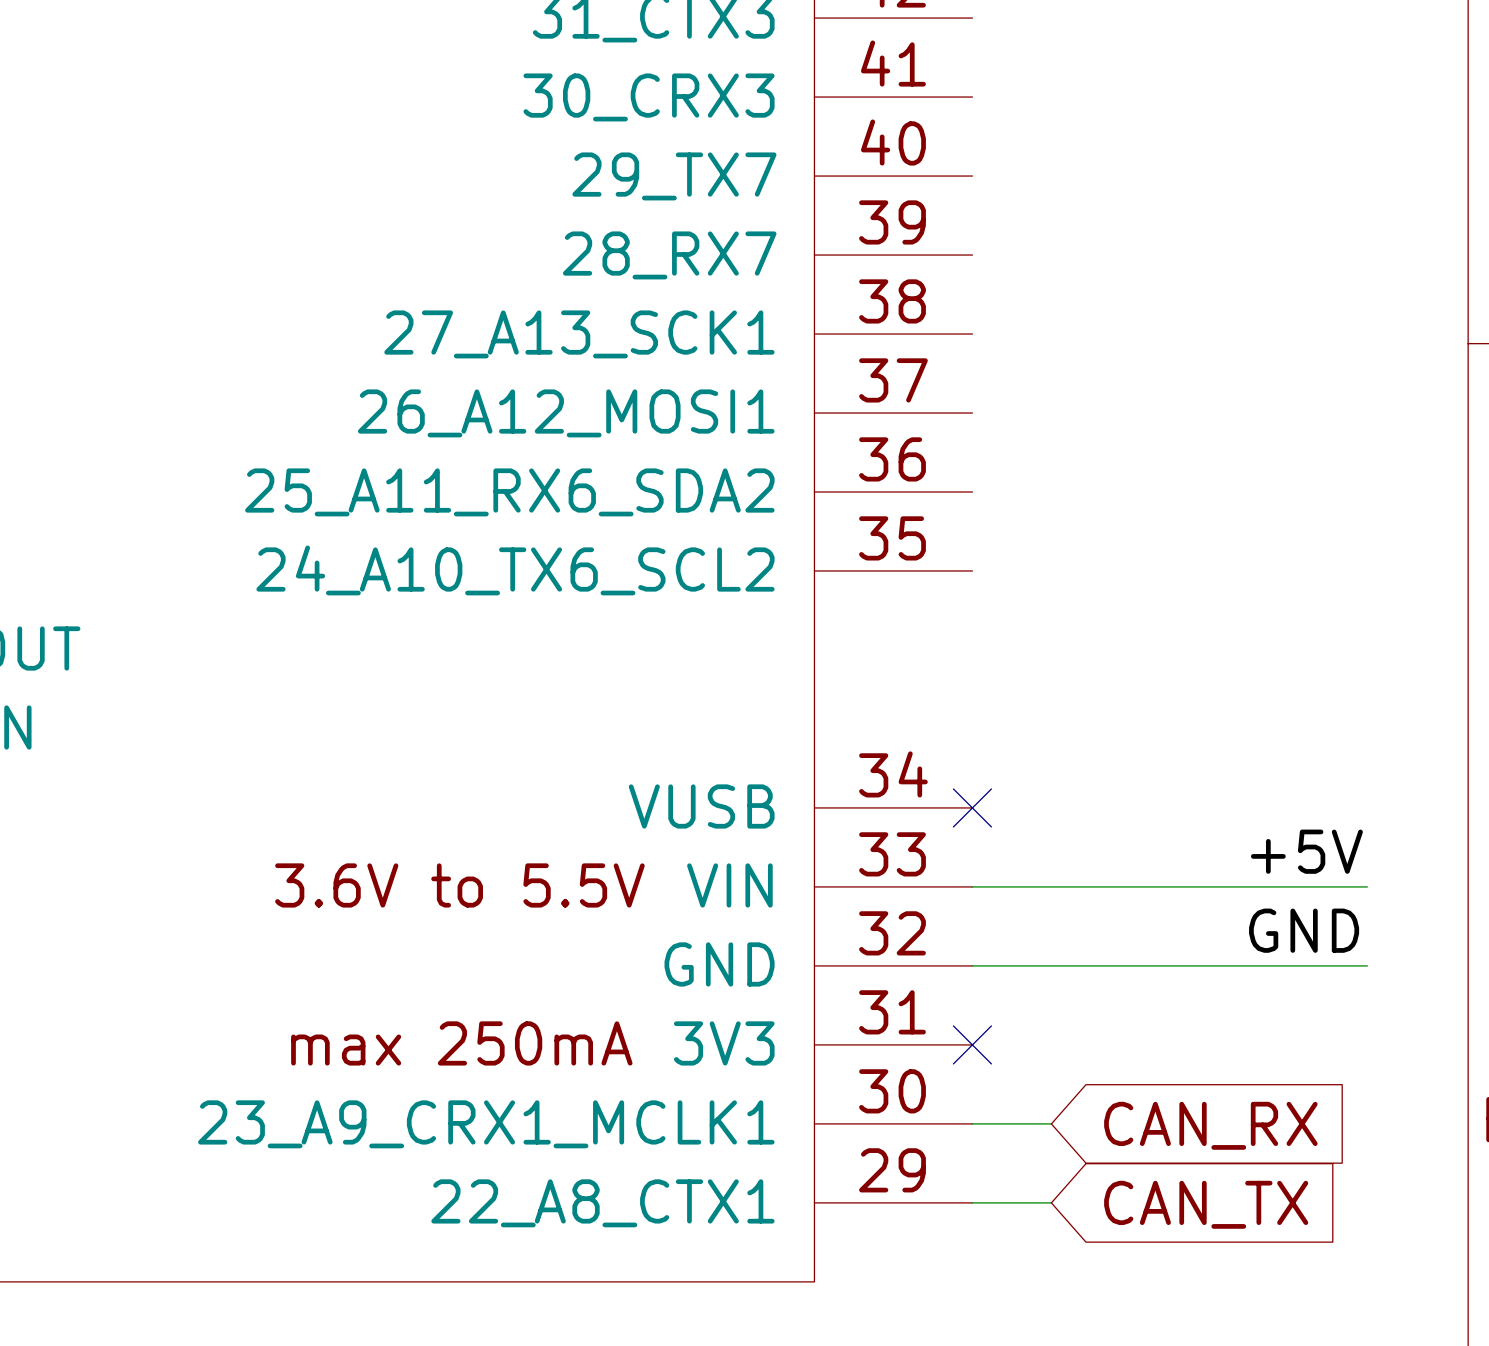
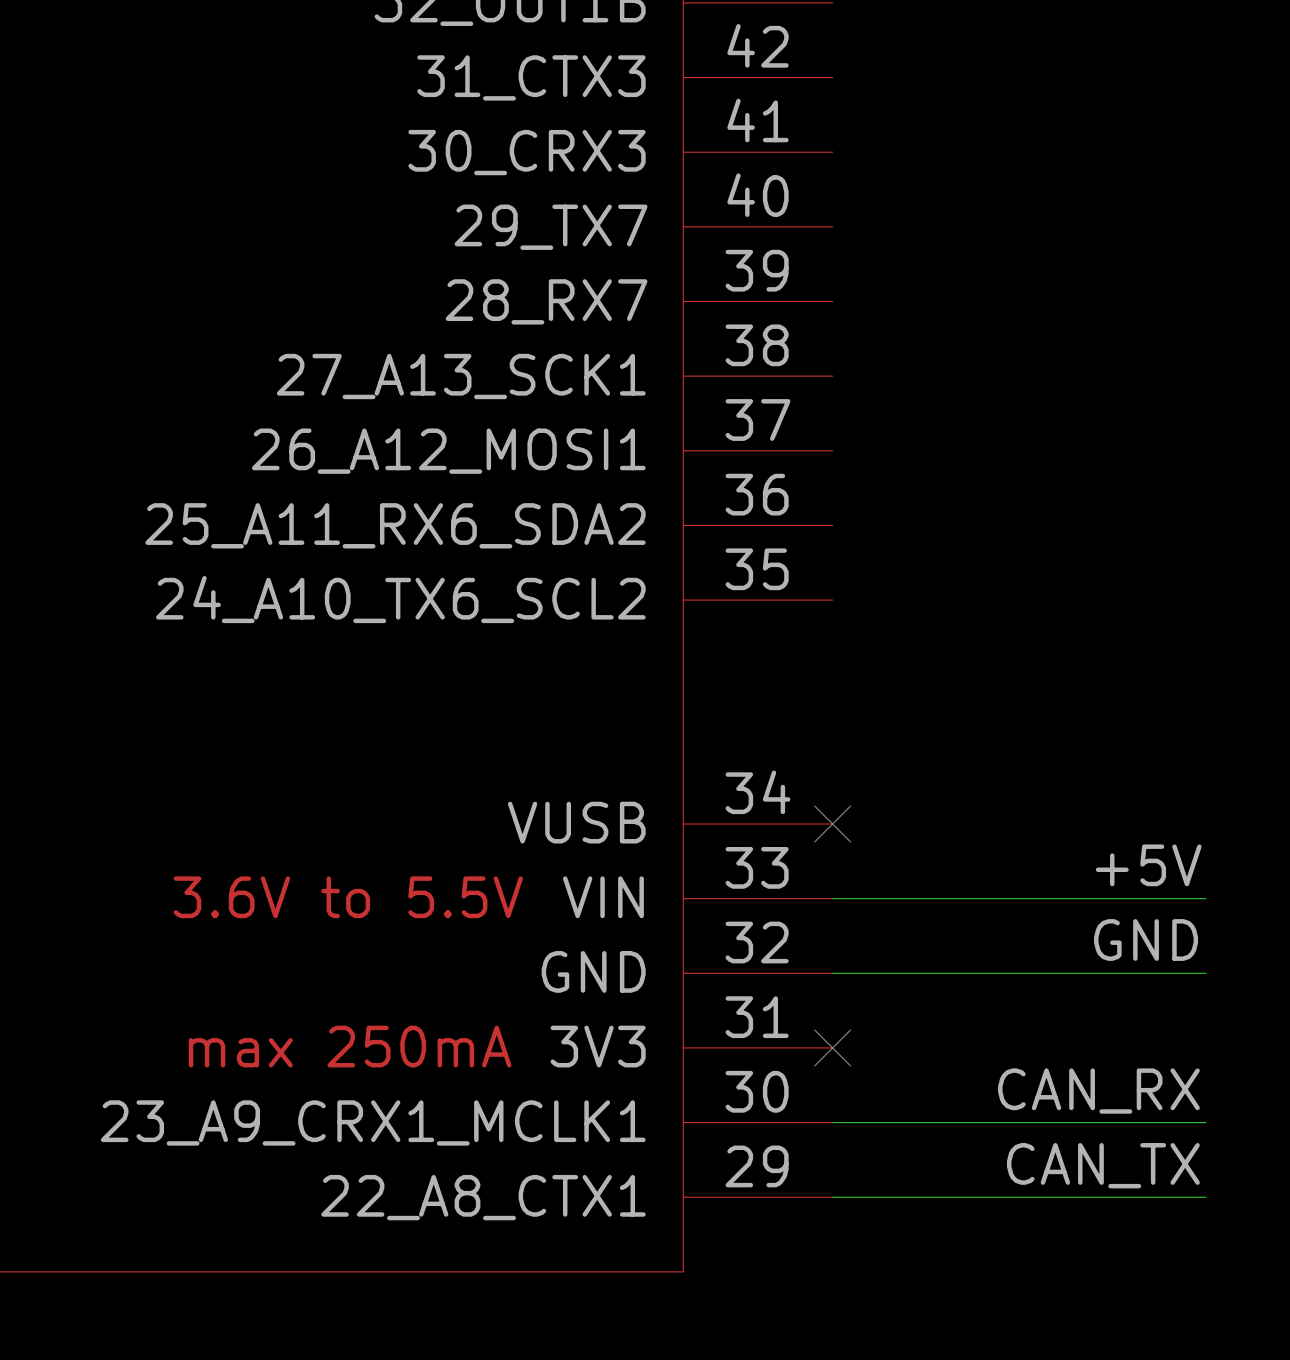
label: none -> CAN_RX (1098, 1091)
wire: none -> (907, 1122) (1205, 1122)
global label: CAN_RX (1210, 1125) -> none
label: none -> CAN_TX (1103, 1165)
wire: none -> (907, 1197) (1205, 1197)
global label: CAN_TX (1206, 1204) -> none

